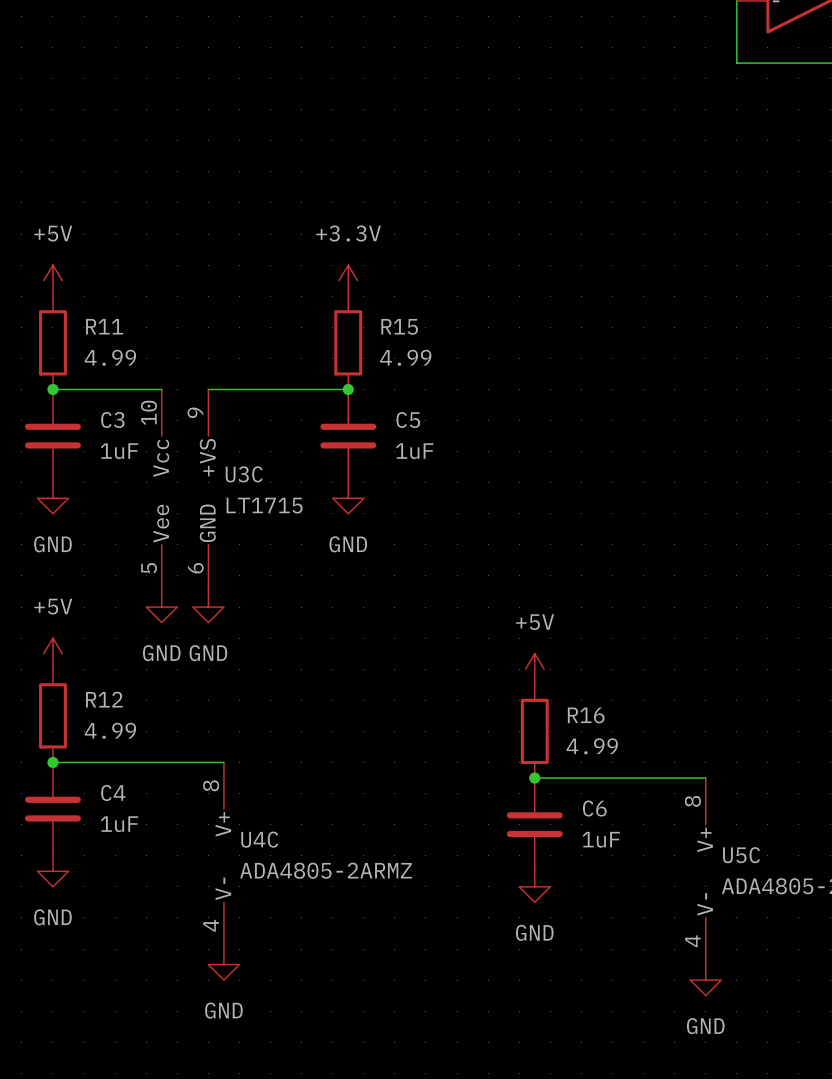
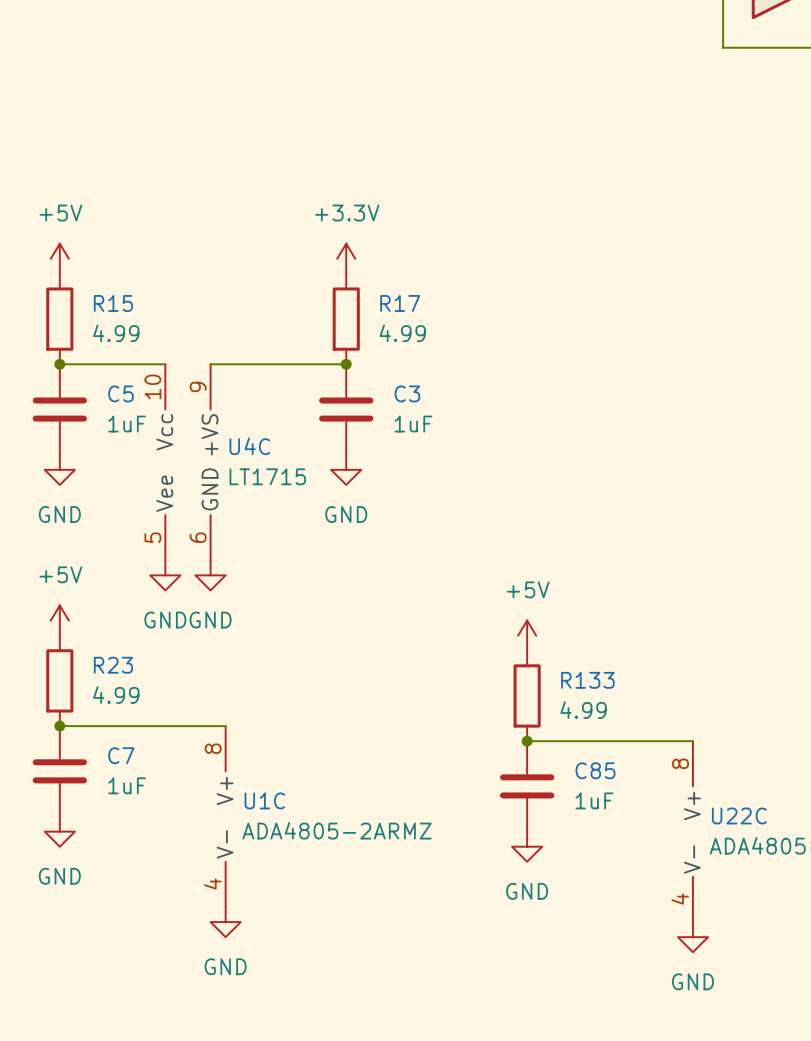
R11 name: R11 (104, 326) -> R15 (113, 303)
R15 name: R15 (399, 326) -> R17 (400, 303)
C3 name: C3 (112, 419) -> C5 (120, 393)
C5 name: C5 (408, 419) -> C3 (407, 393)
U3C name: U3C (244, 474) -> U4C (249, 446)
R12 name: R12 (104, 699) -> R23 (113, 665)
R16 name: R16 (586, 715) -> R133 (587, 680)
C4 name: C4 (113, 793) -> C7 (121, 755)
C6 name: C6 (594, 808) -> C85 (595, 770)
U4C name: U4C (259, 839) -> U1C (264, 800)
U5C name: U5C (741, 855) -> U22C (739, 815)

